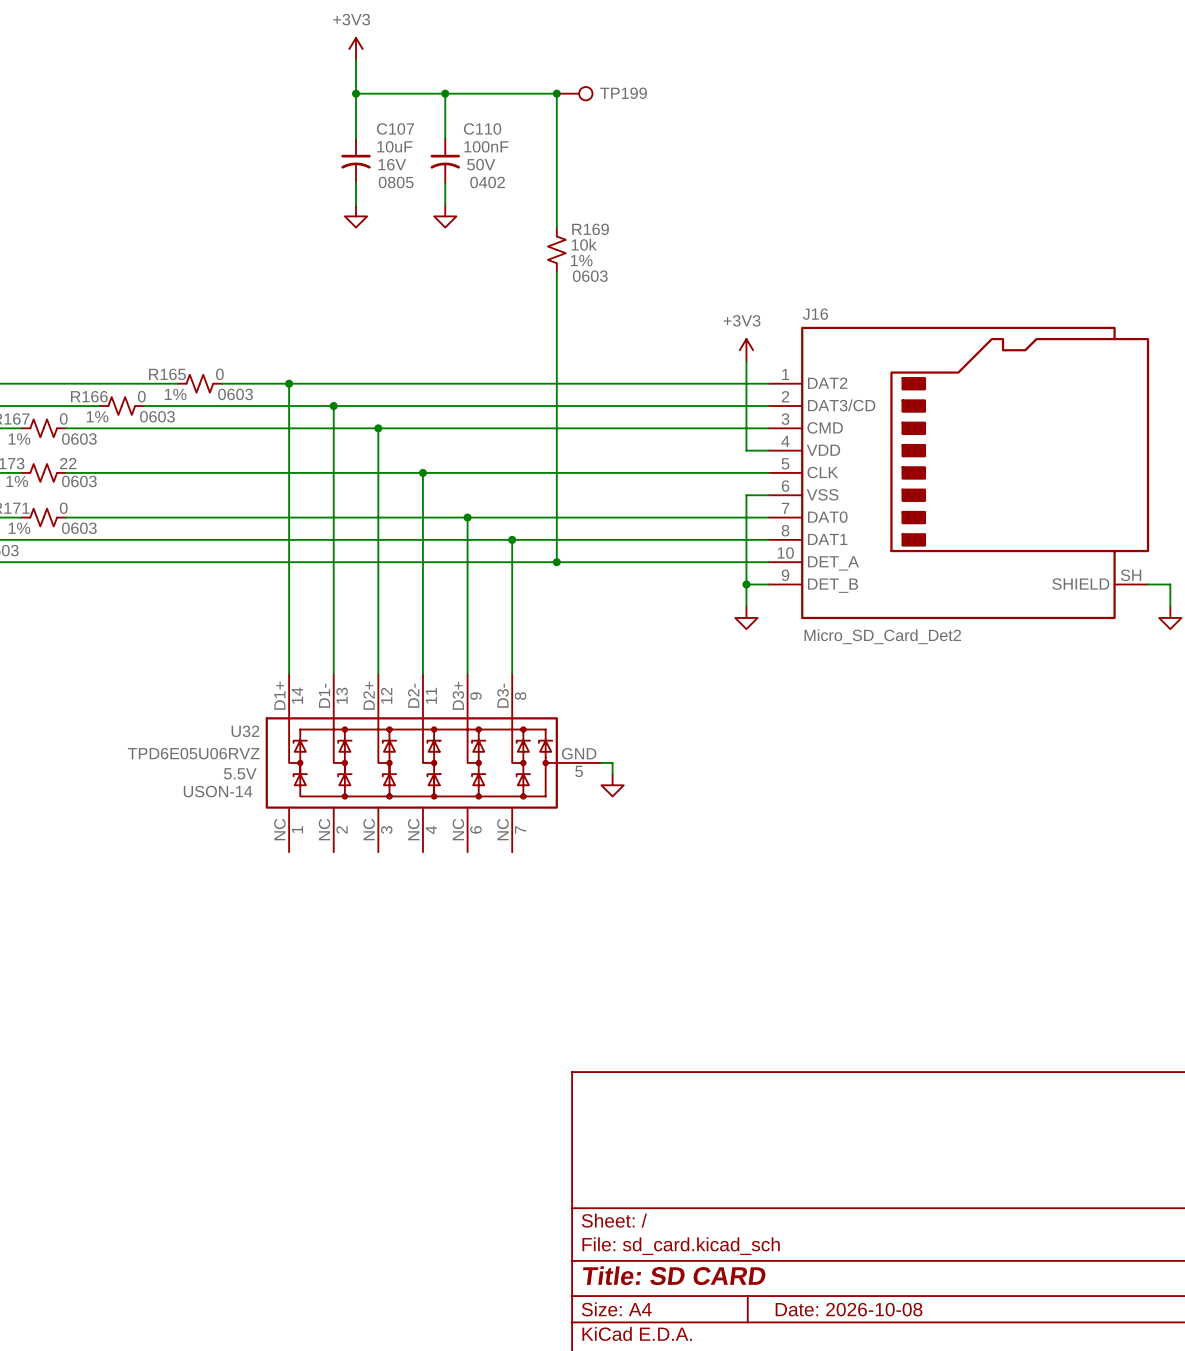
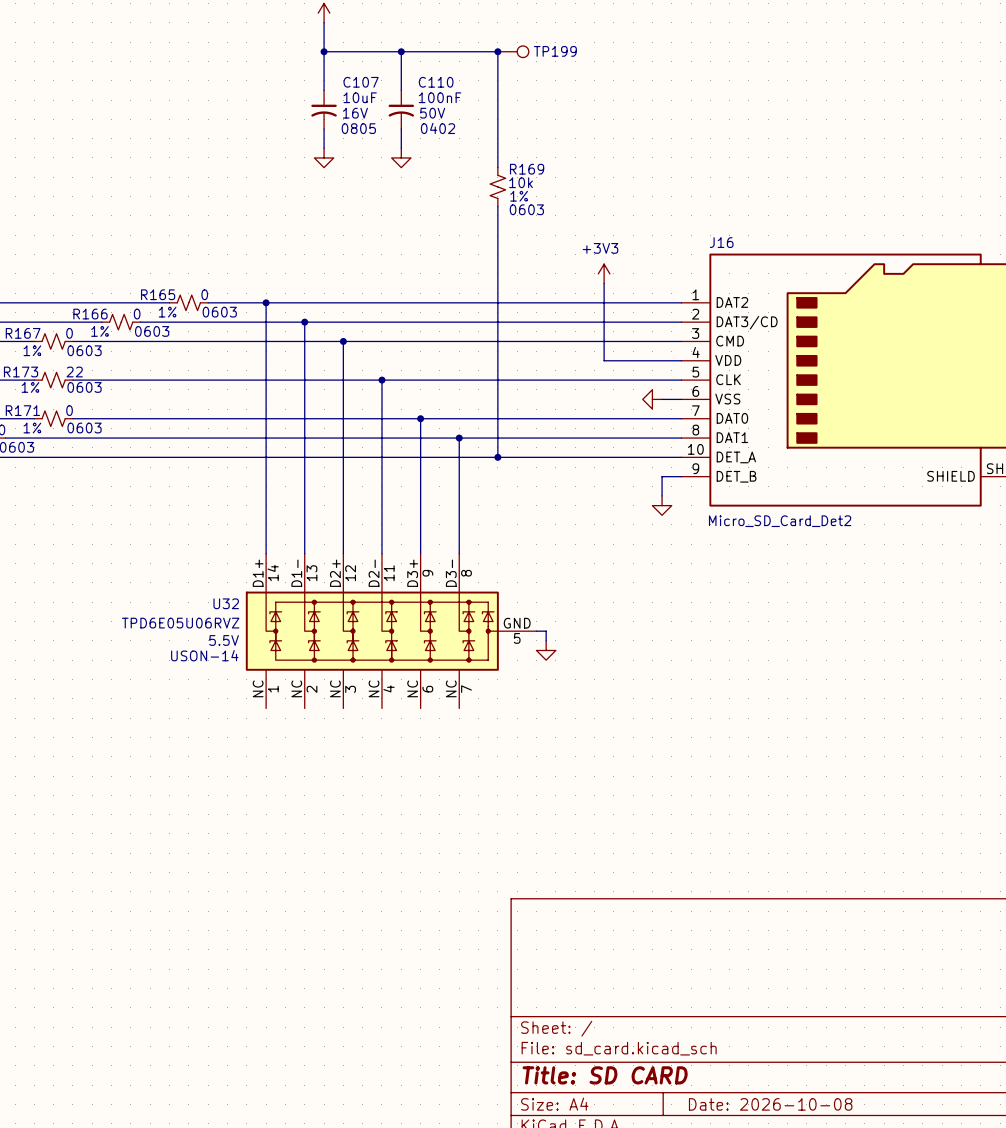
power symbol position: +3V3 (746, 350) -> +3V3 (604, 273)
wire: (746, 361) (746, 450) -> (604, 283) (604, 360) (662, 360)
power symbol: none -> (652, 399)
wire: (746, 495) (746, 584) -> none
junction: (746, 584) -> none

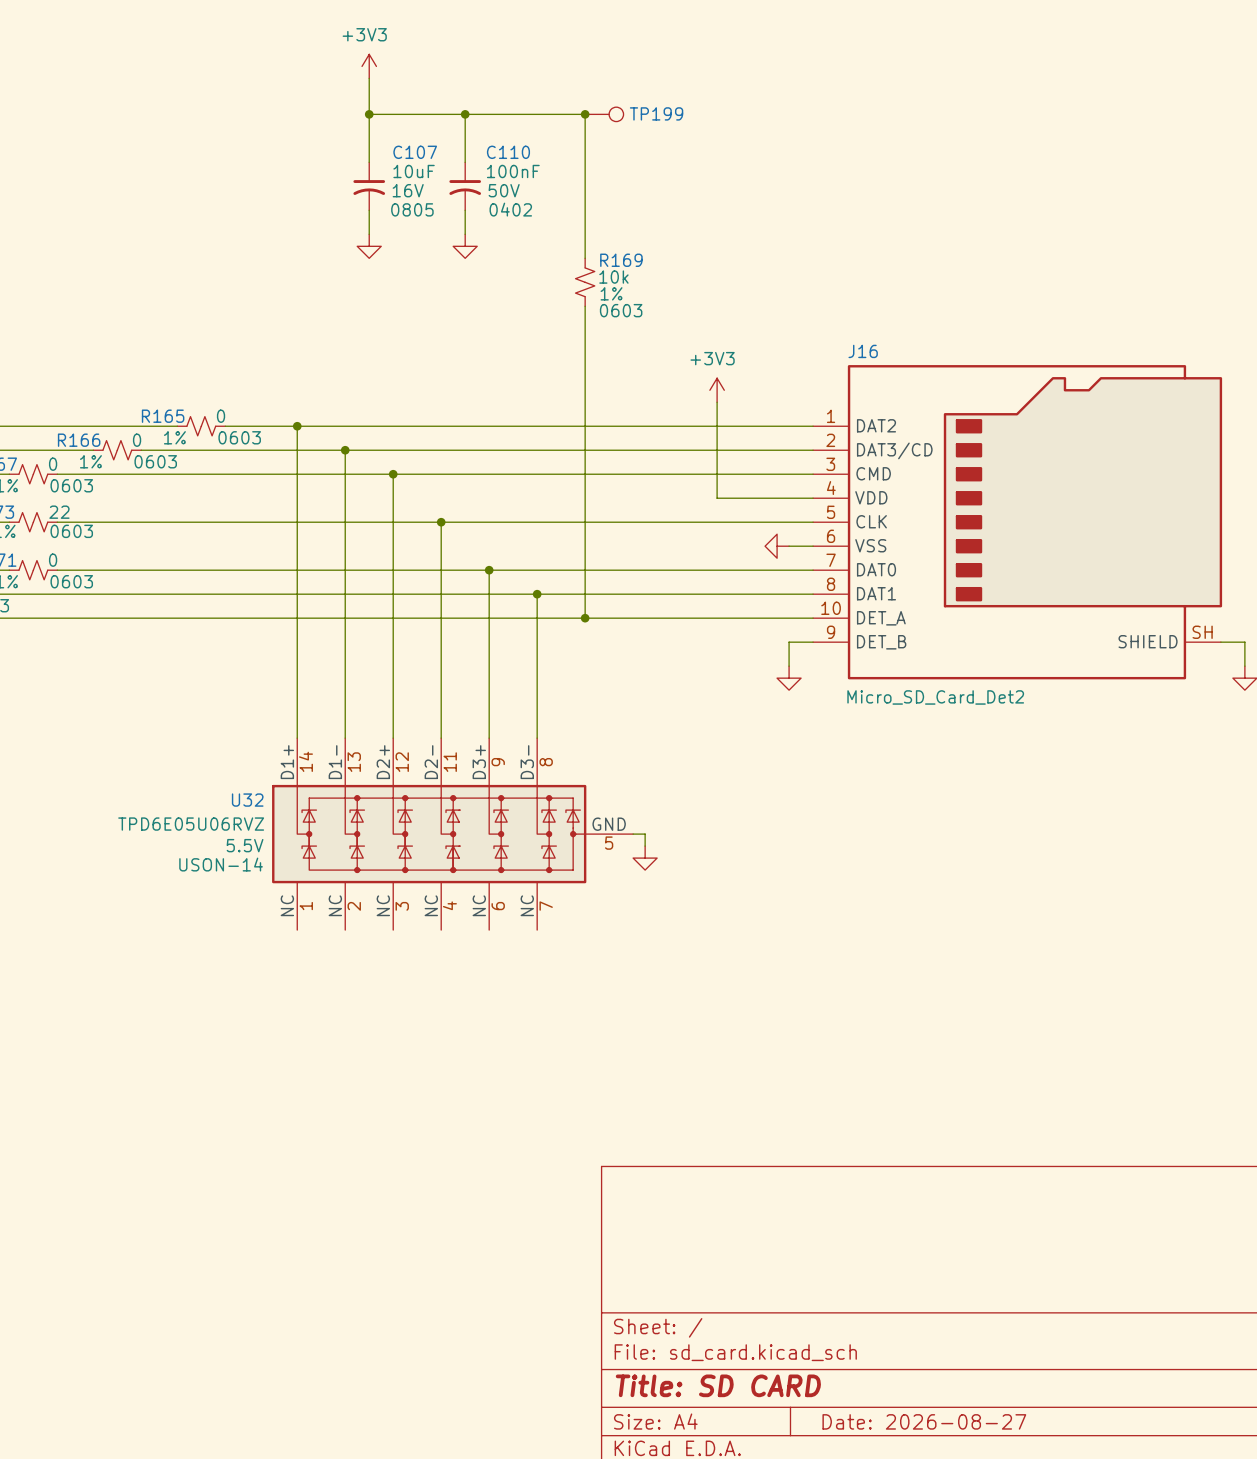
title block: Date: 2026-10-08 (770, 1104) -> Date: 2026-08-27 (924, 1421)

